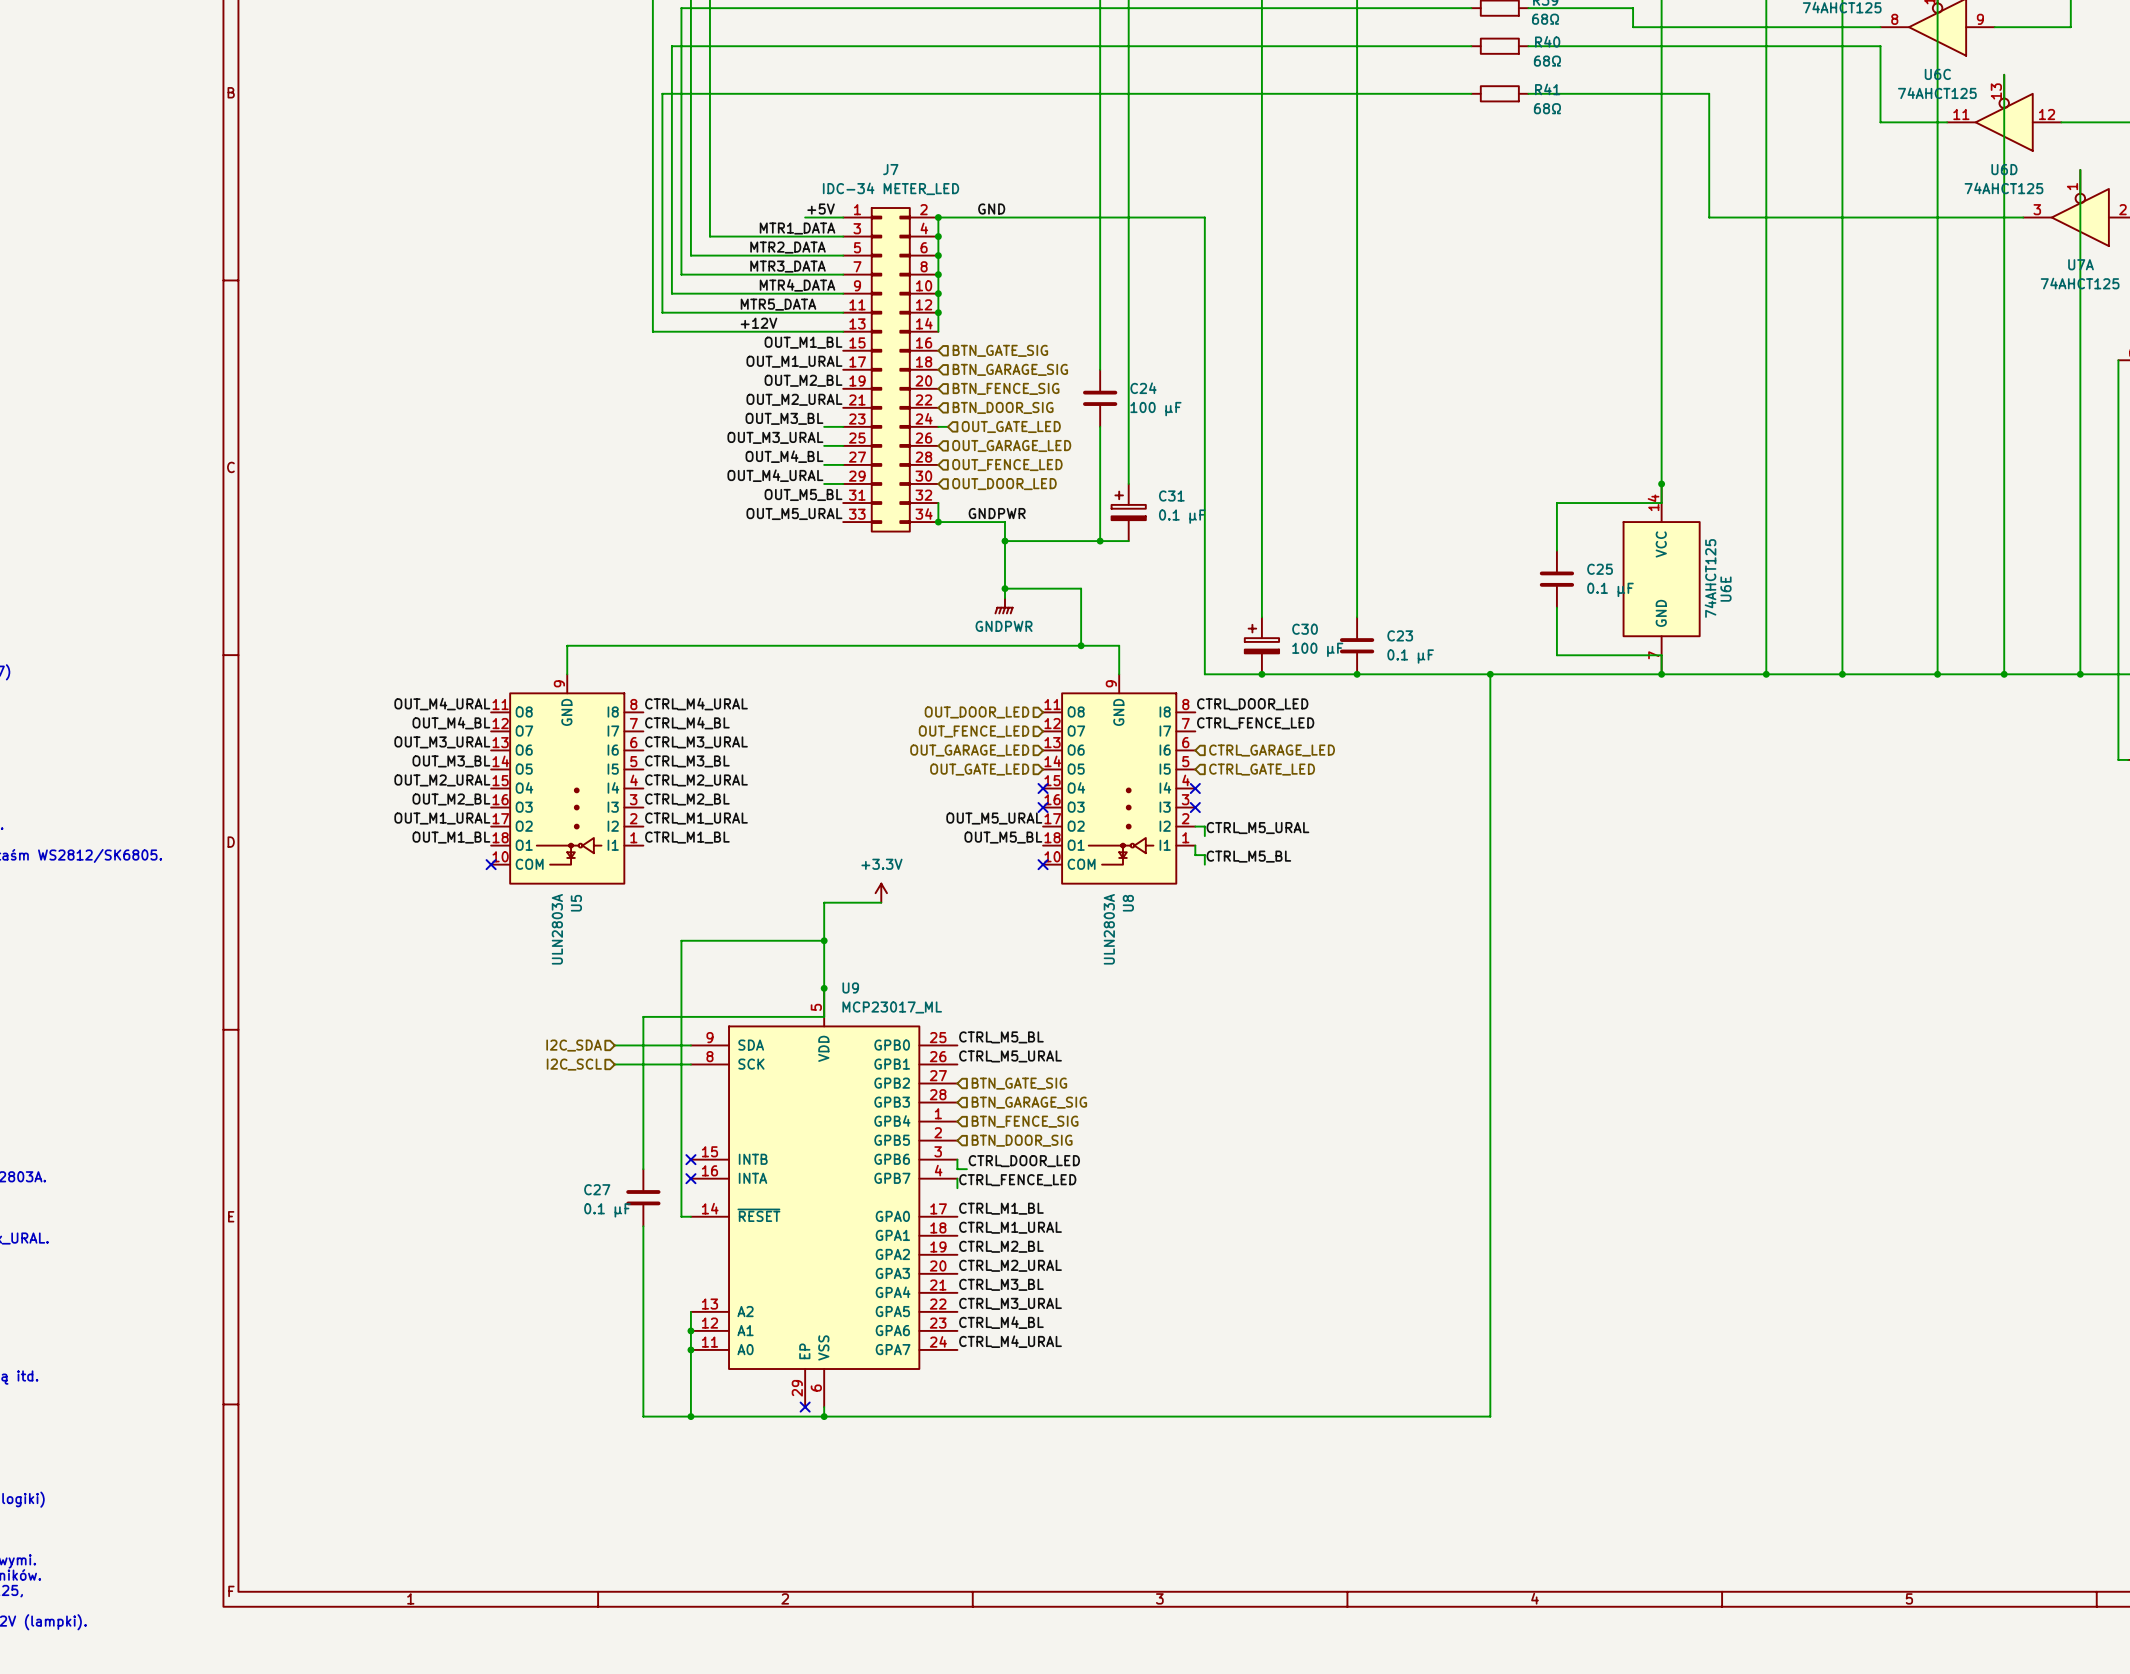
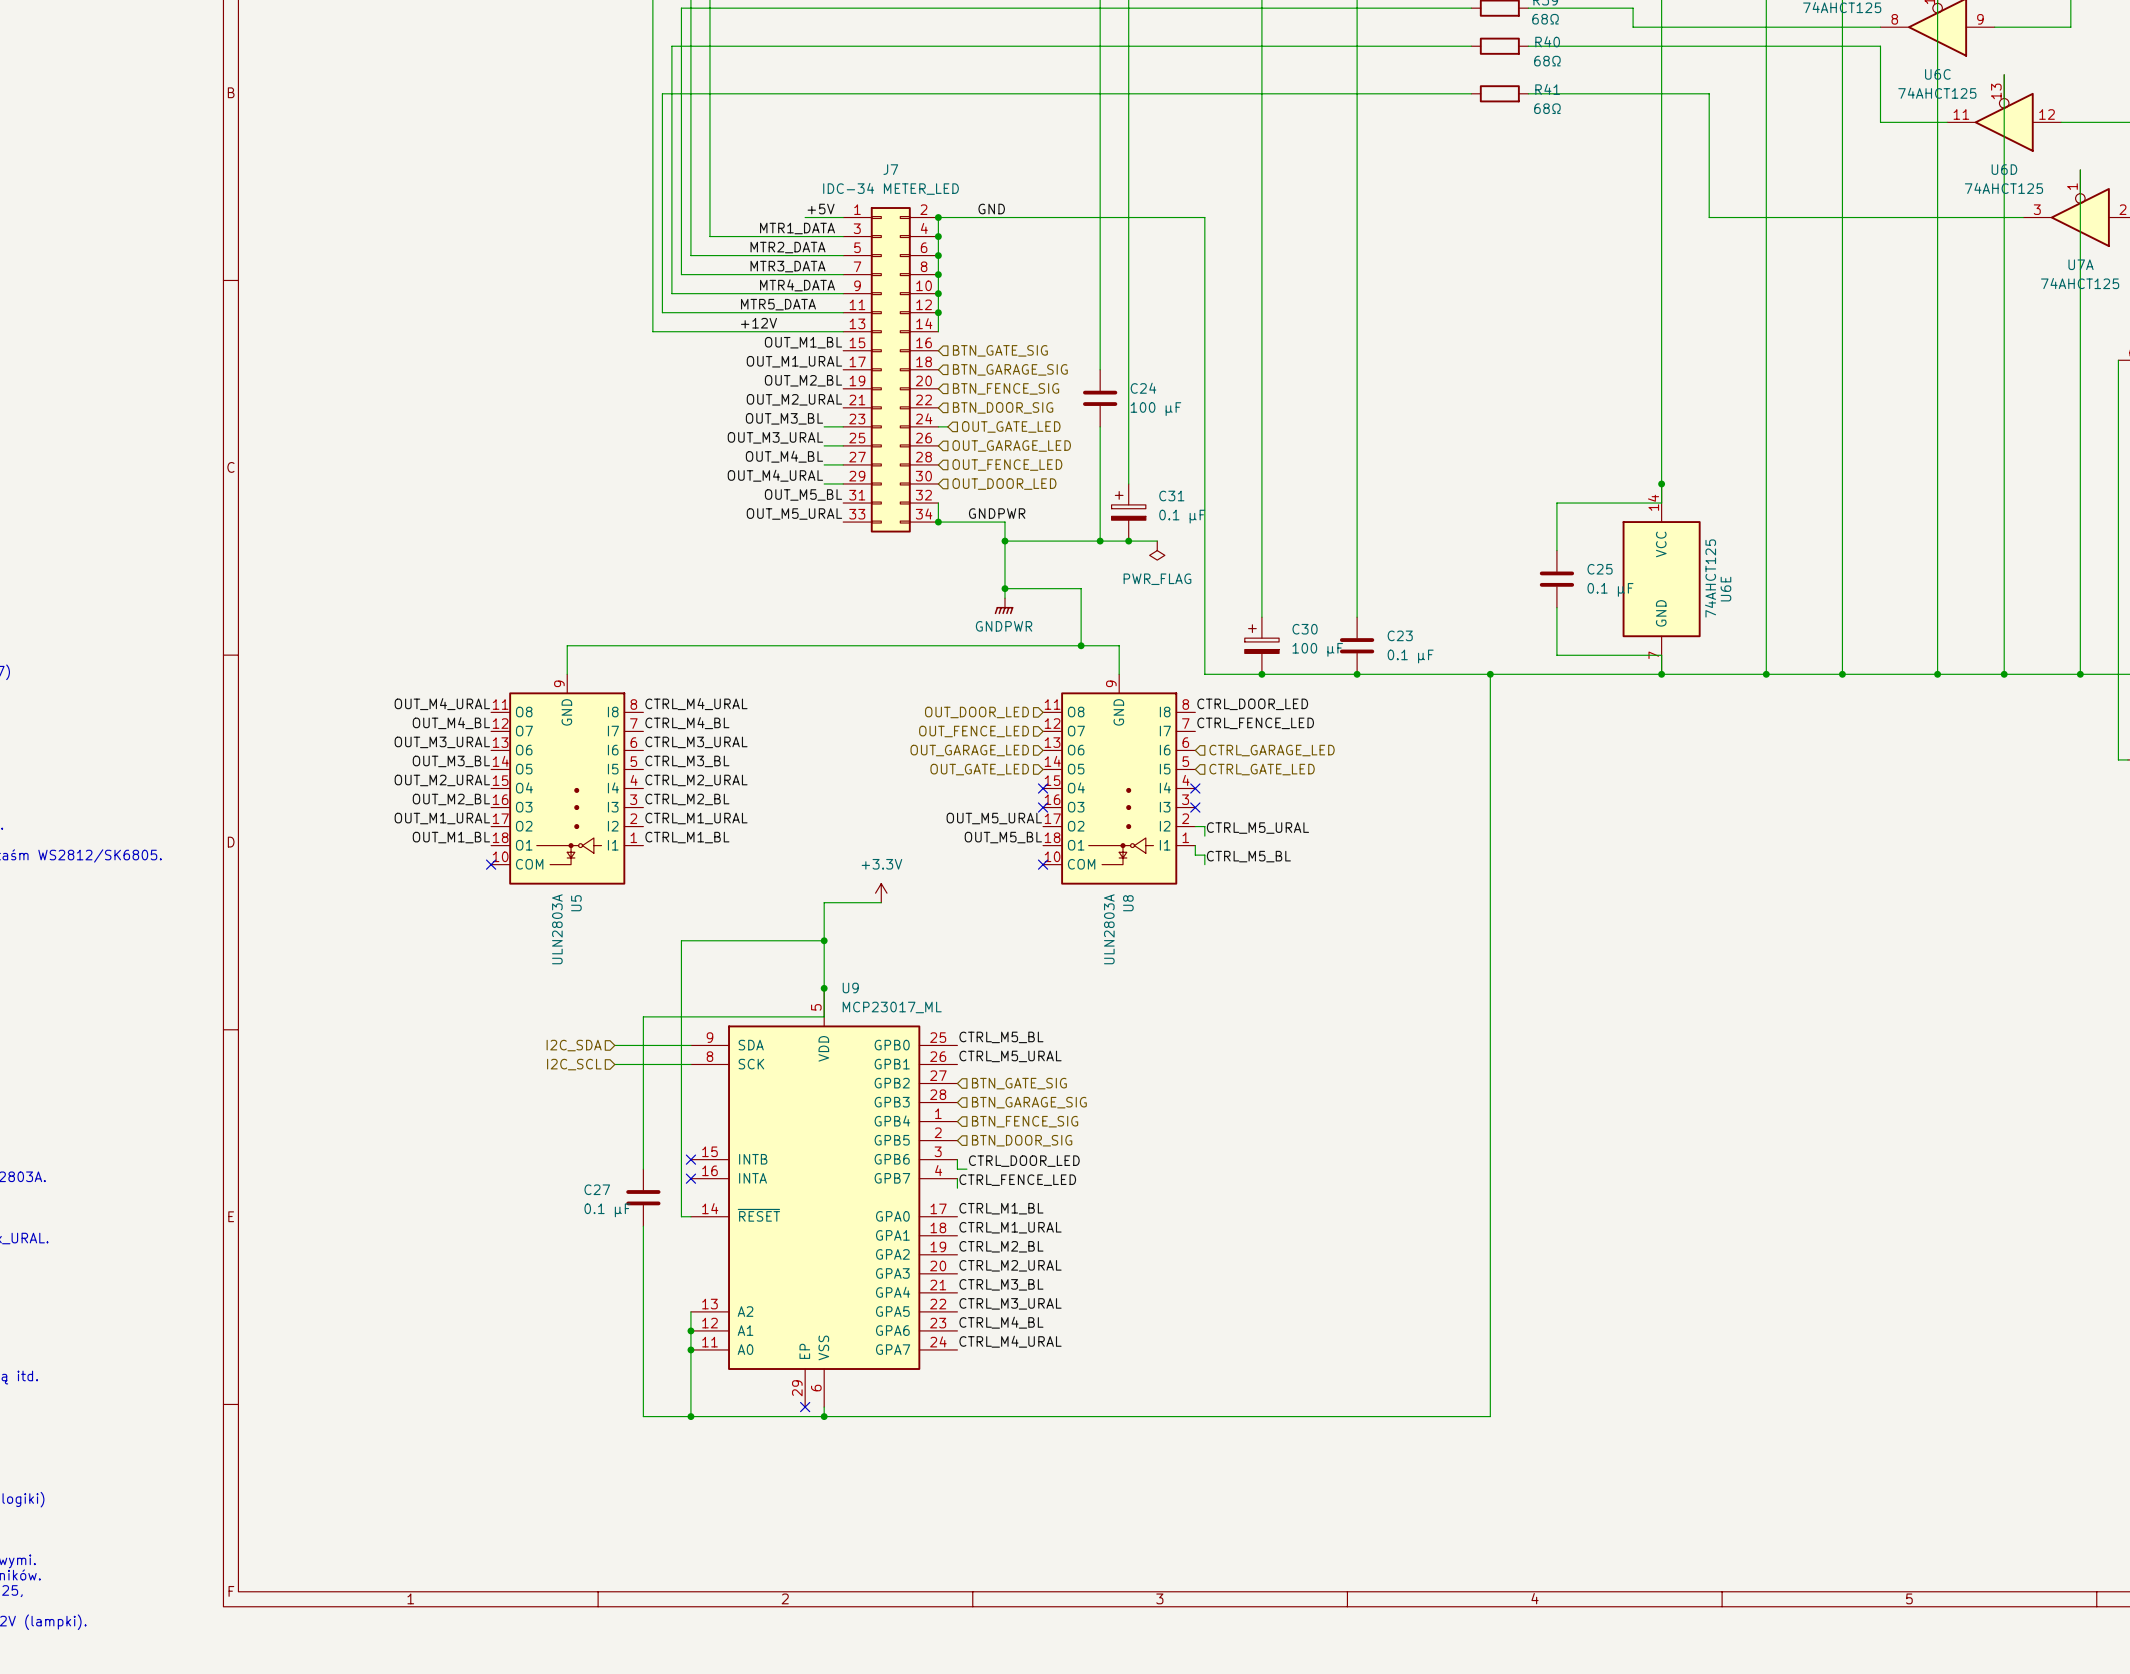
wire: none -> (1128, 541) (1157, 541)
junction: none -> (1128, 541)
power symbol: none -> PWR_FLAG (1157, 550)

